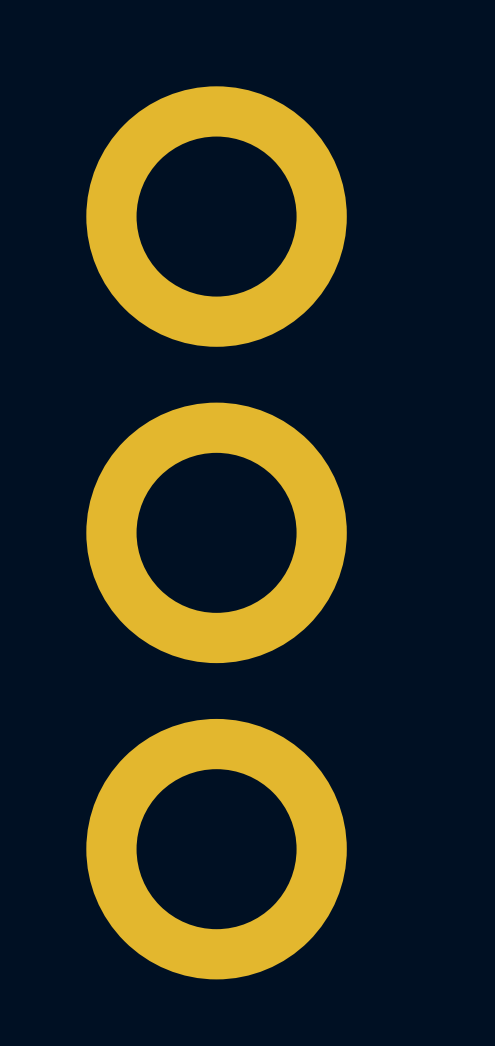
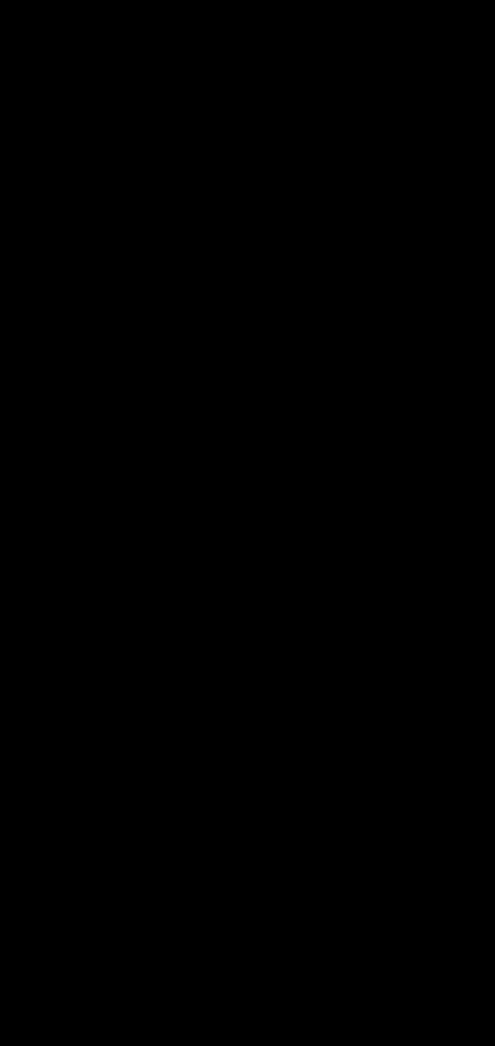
part: (216, 216) -> none
part: (216, 532) -> none
part: (216, 849) -> none

